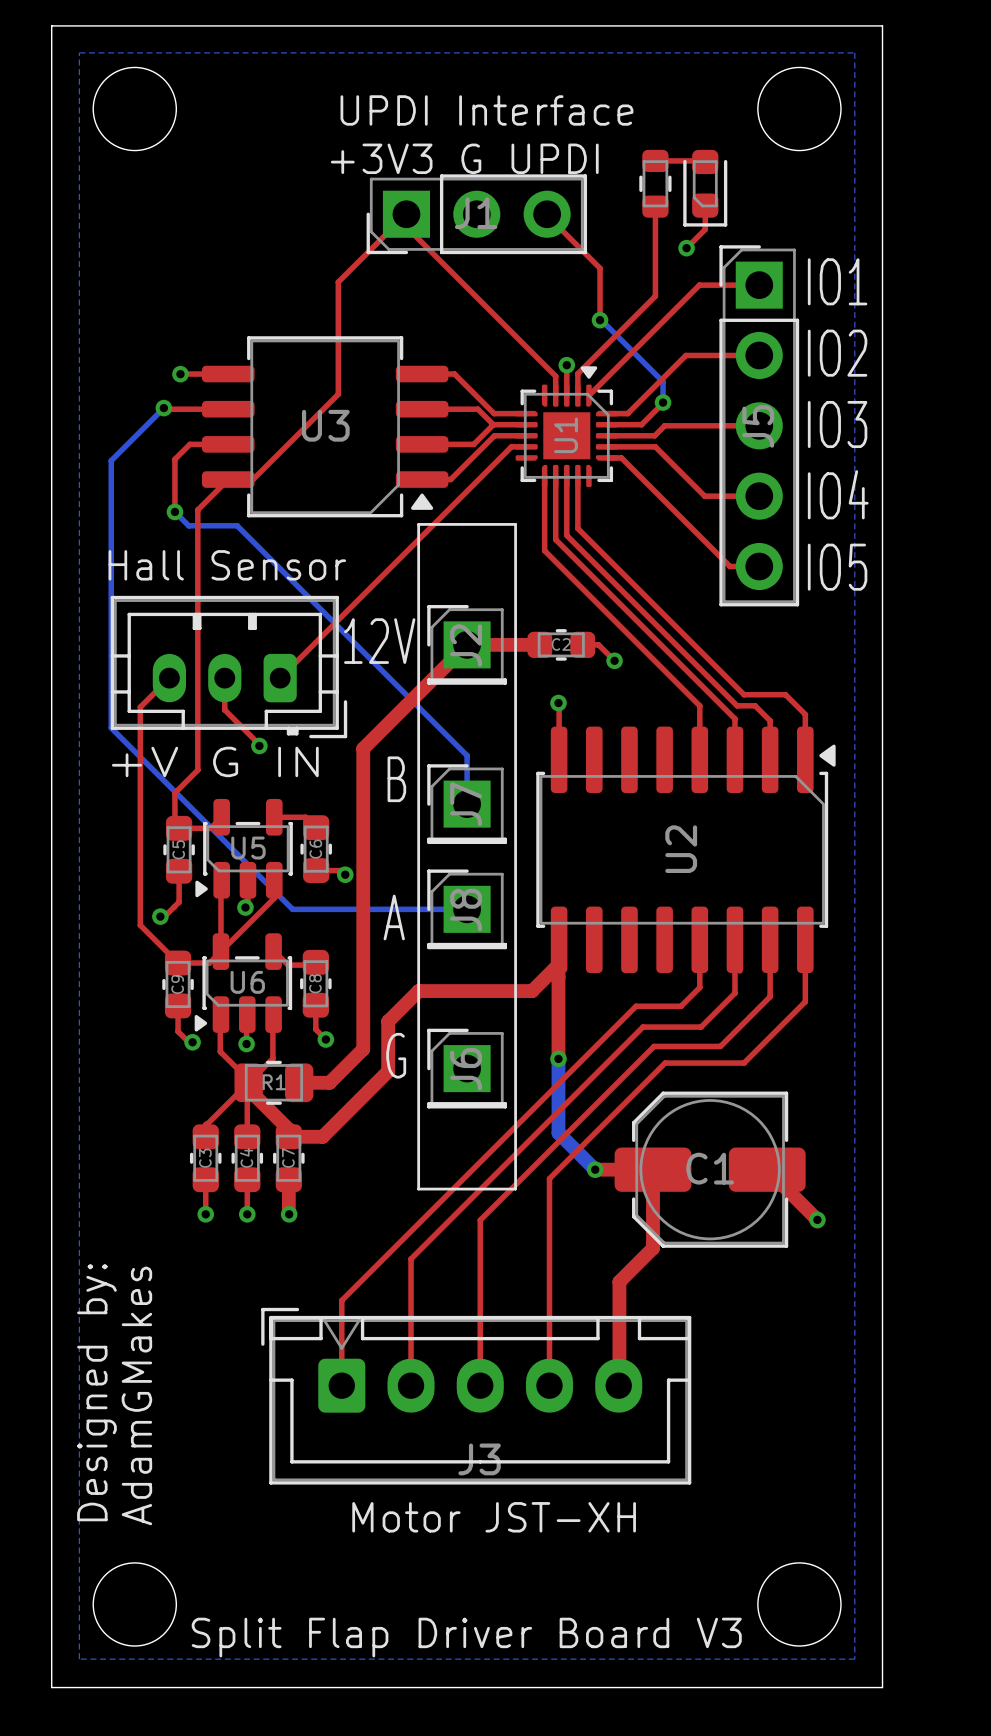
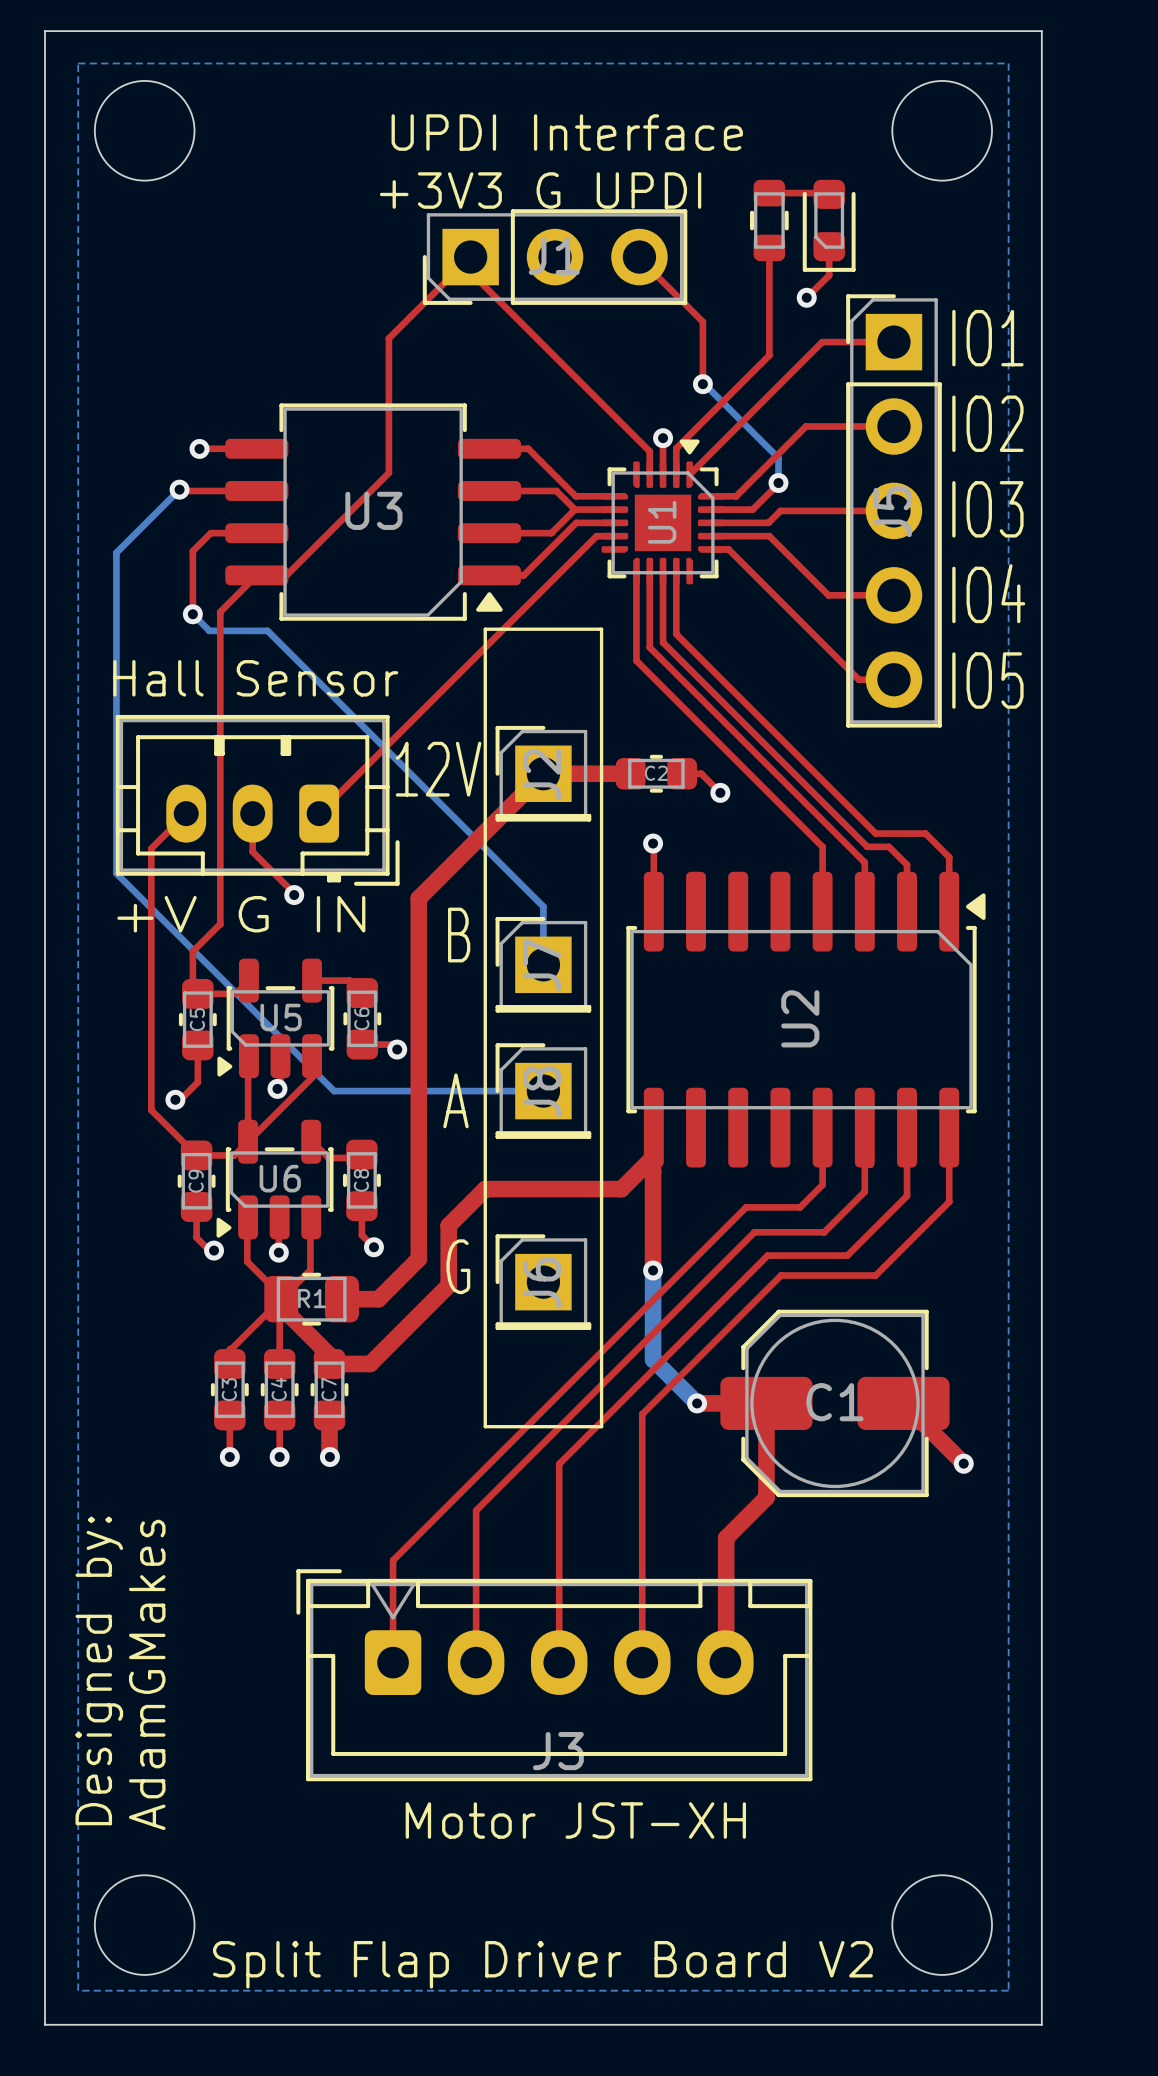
text: Split Flap Driver Board V3 (466, 1637) -> Split Flap Driver Board V2 (542, 1964)

